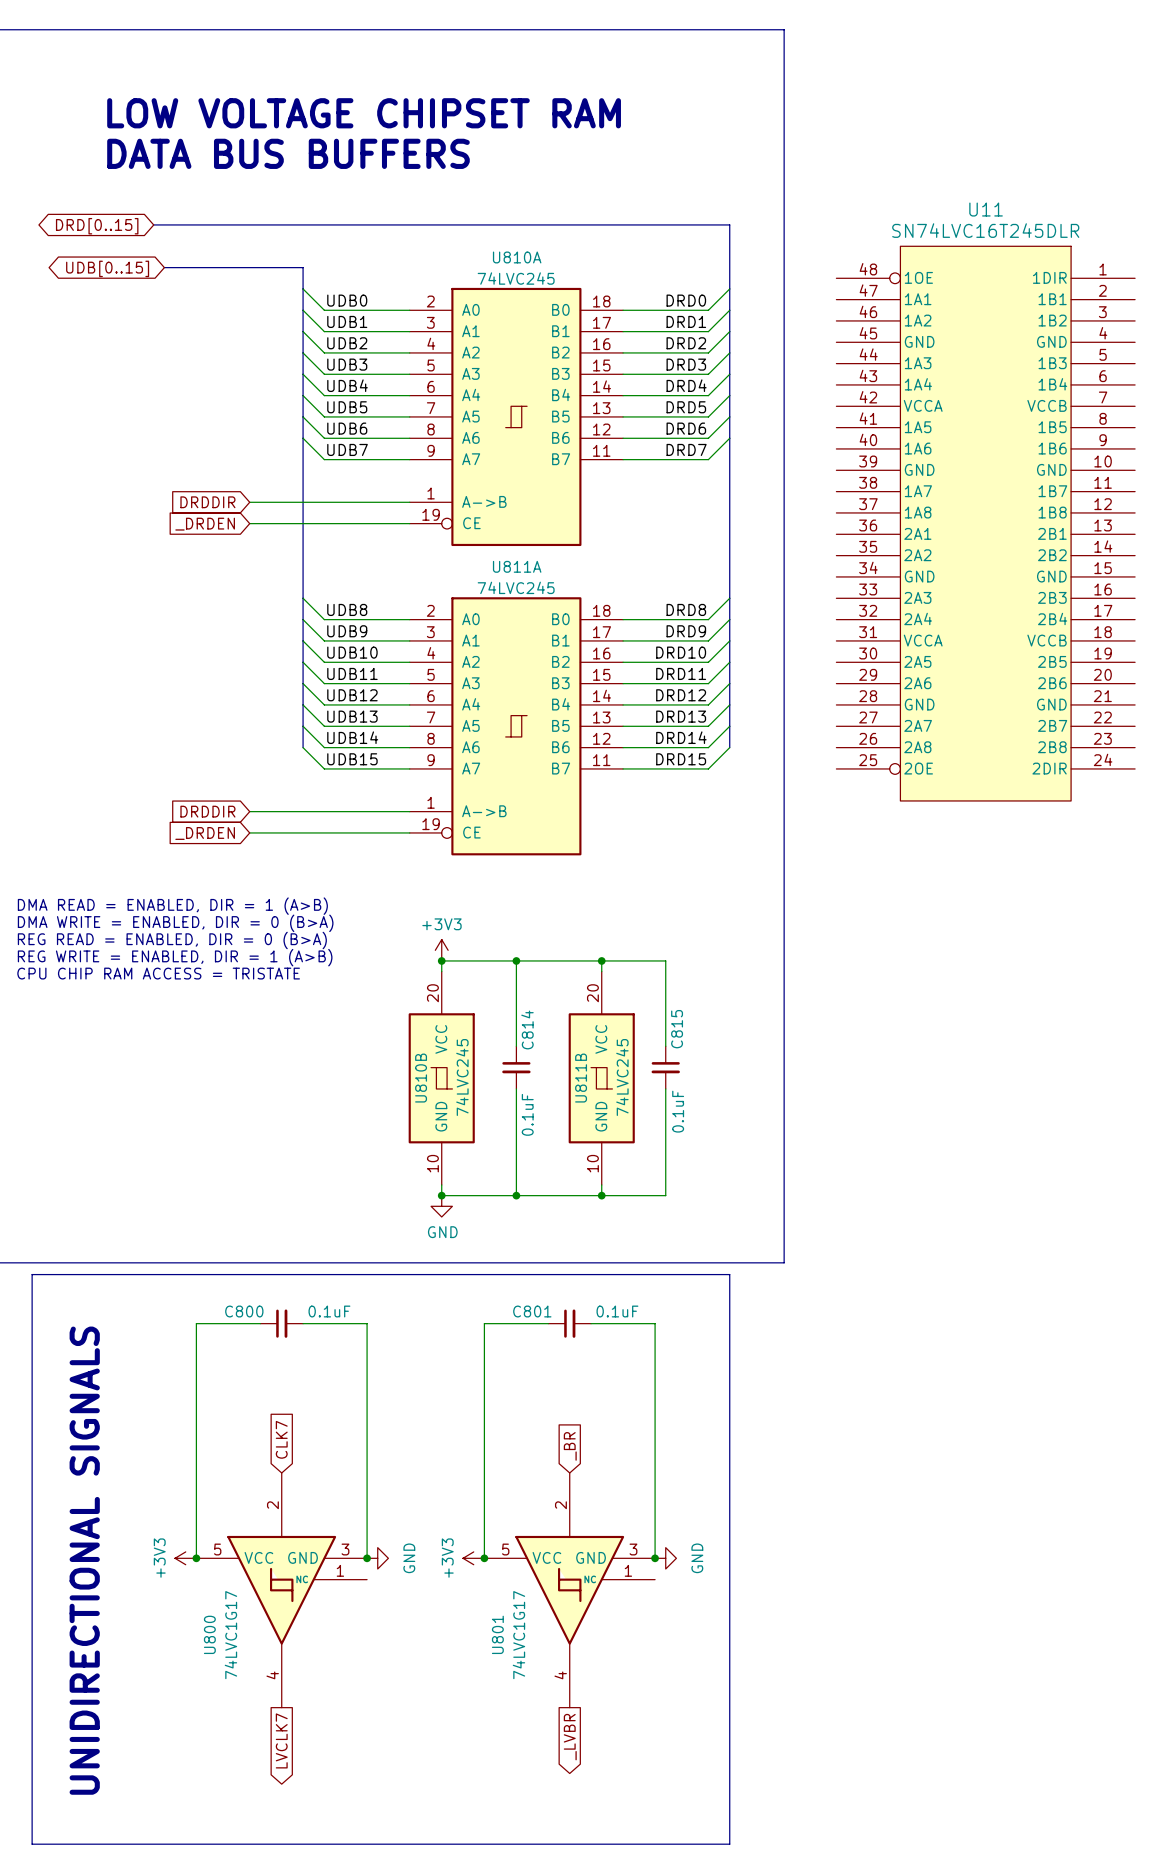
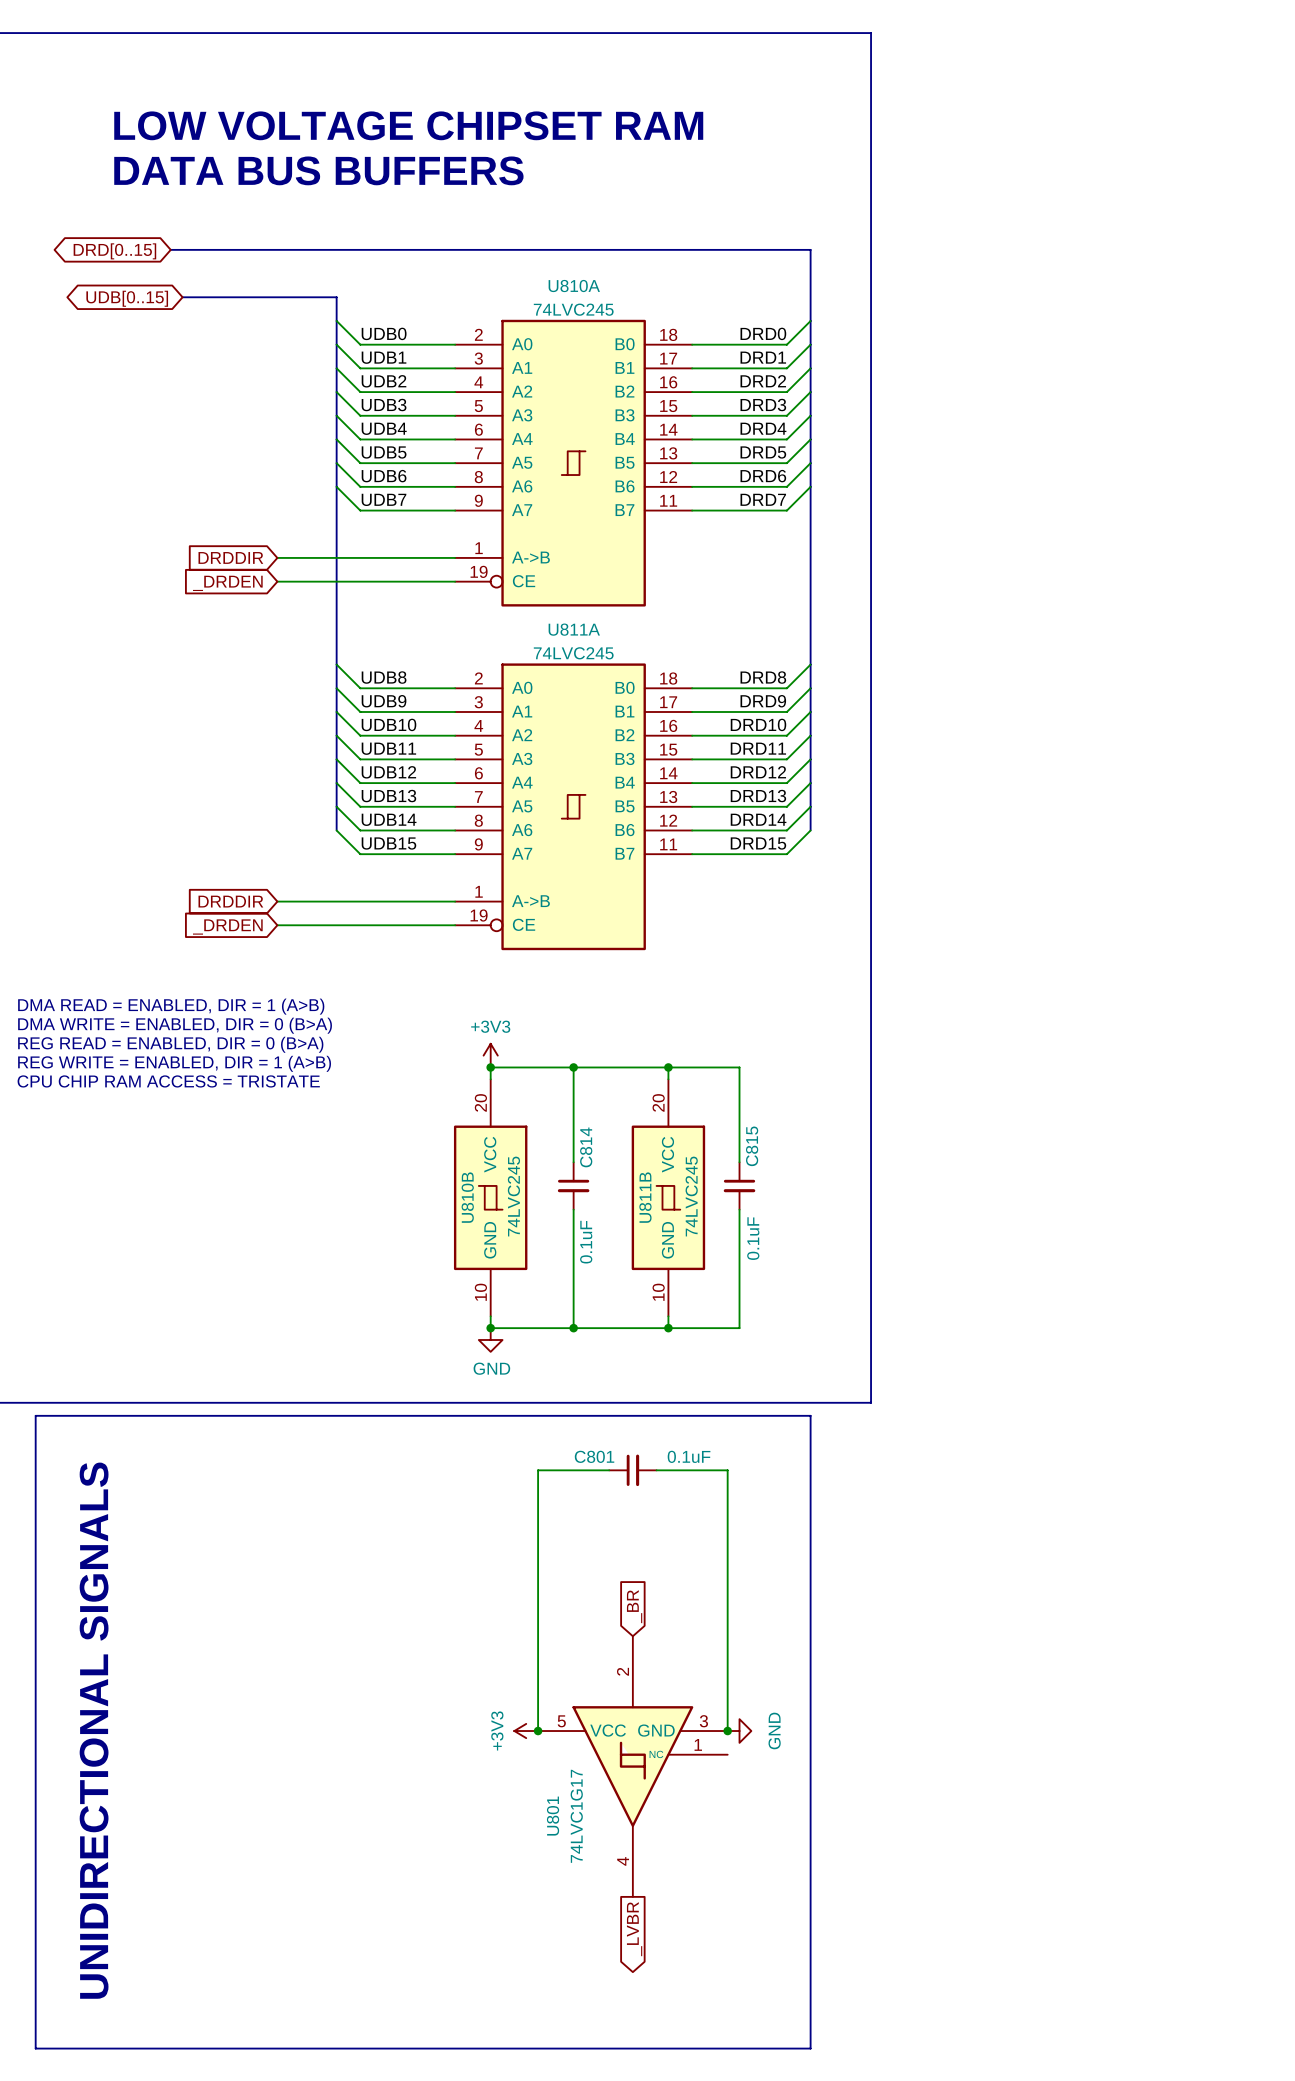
U11: SN74LVC16T245DLR (985, 523) -> none
wire: (260, 1323) (196, 1323) (196, 1558) -> none
C800: 0.1uF (281, 1323) -> none
wire: (303, 1323) (367, 1323) (367, 1558) -> none
global label: CLK7 (281, 1439) -> none
power symbol: +3V3 (185, 1558) -> none
junction: (196, 1558) -> none
junction: (367, 1558) -> none
power symbol: GND (377, 1558) -> none
U800: 74LVC1G17 (281, 1590) -> none
global label: LVCLK7 (281, 1740) -> none

